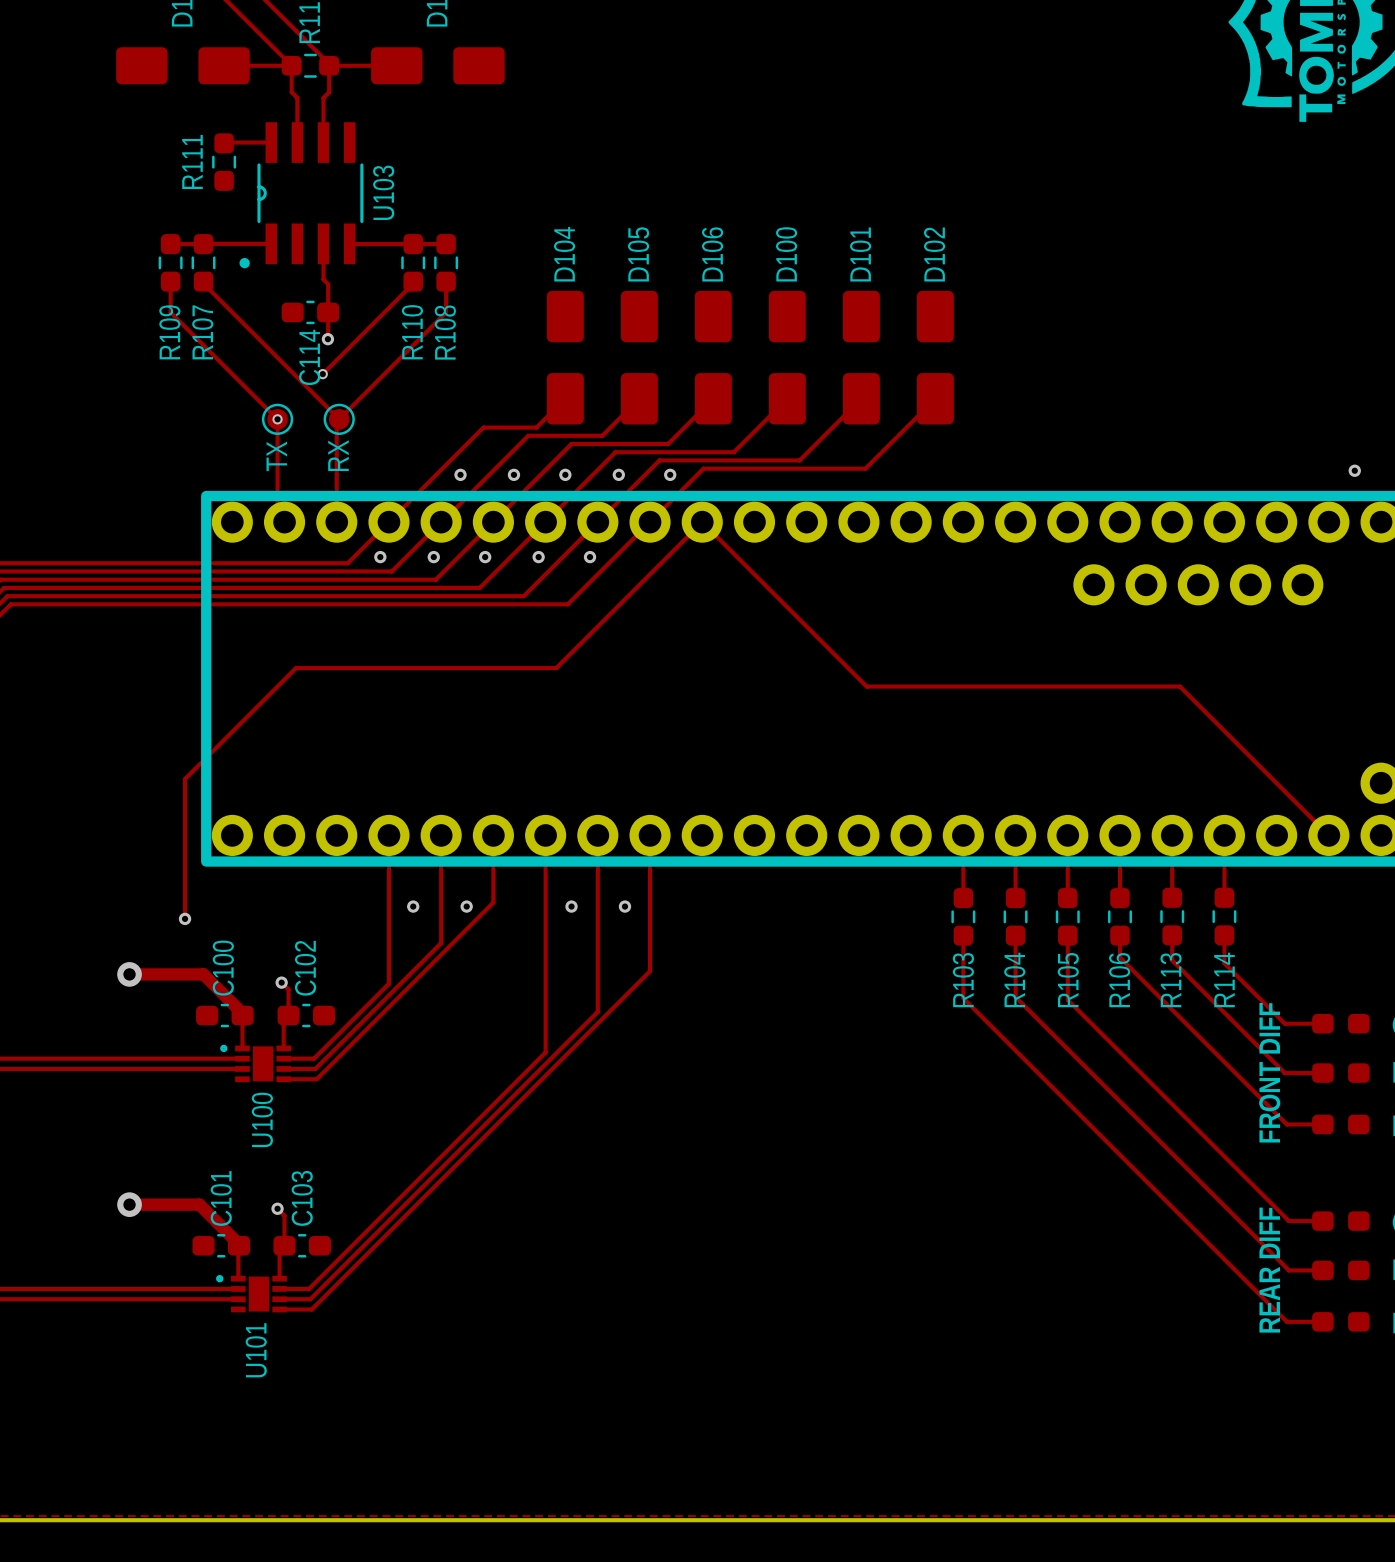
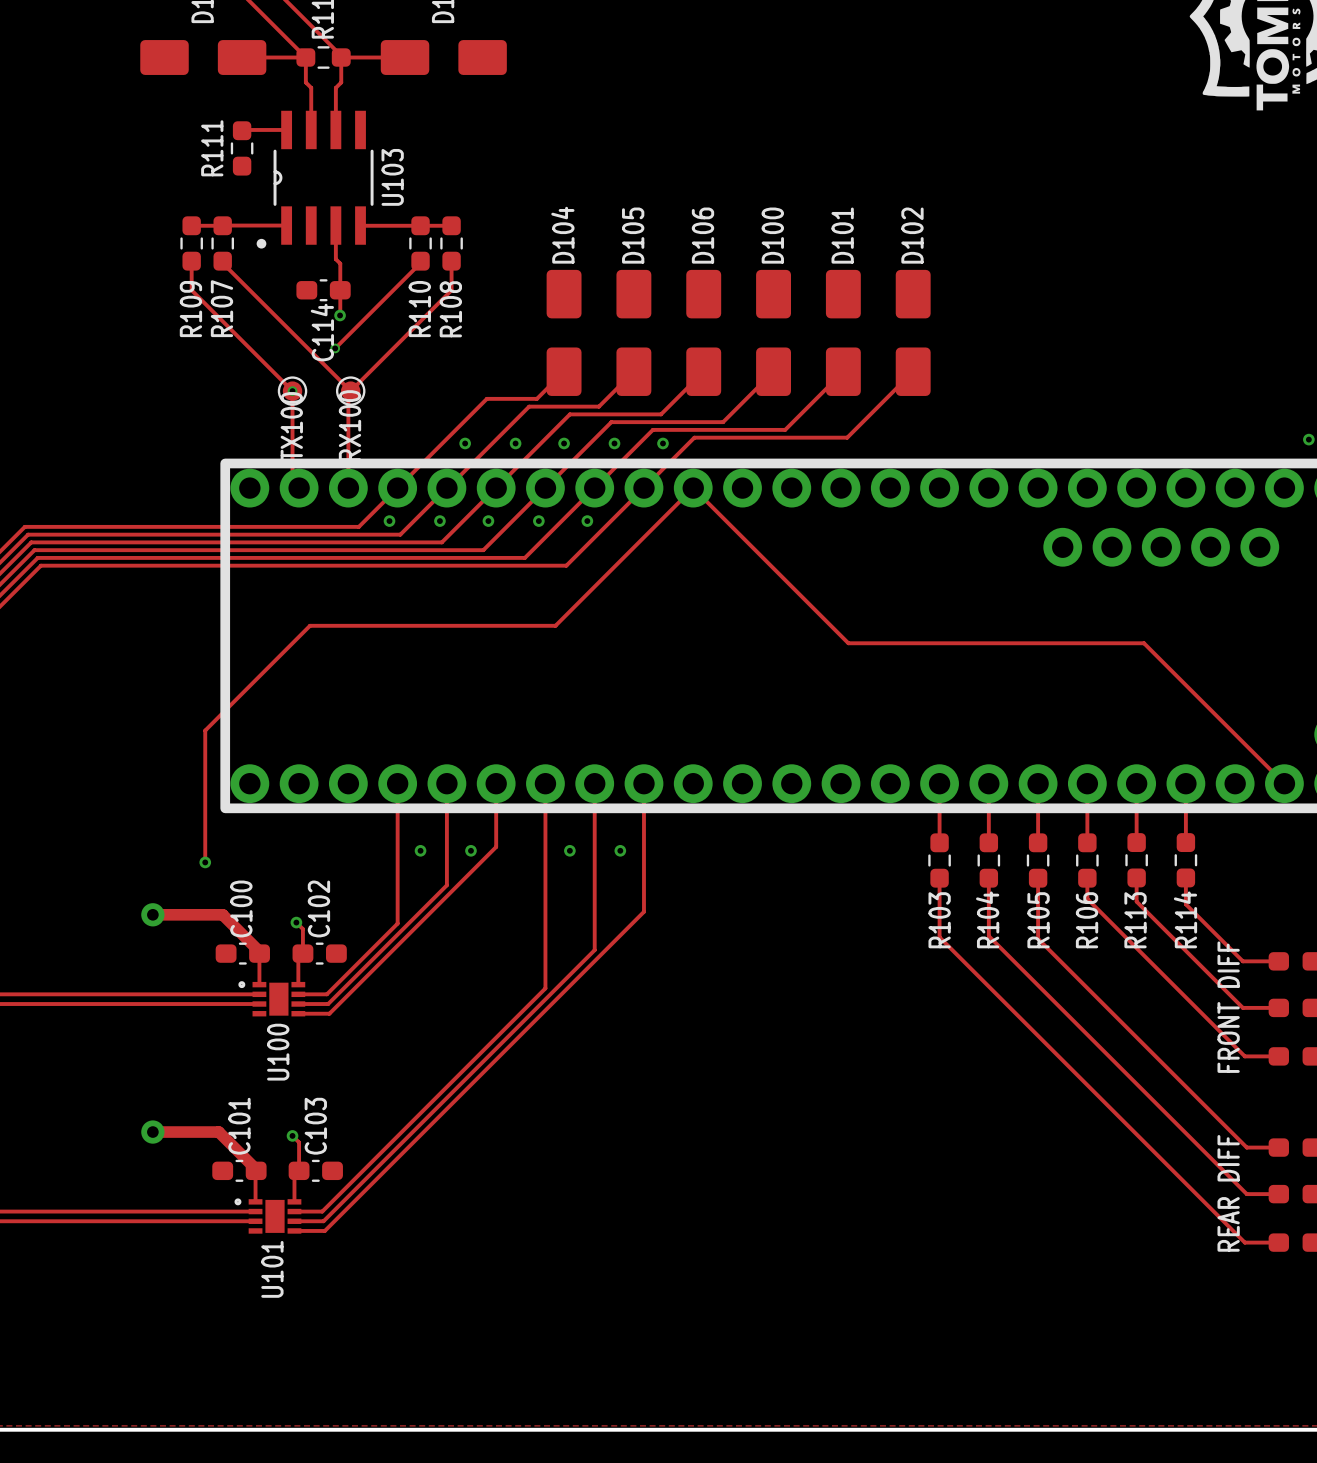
RX name: RX (338, 455) -> RX100 (349, 425)
TX name: TX (276, 456) -> TX100 (291, 426)

